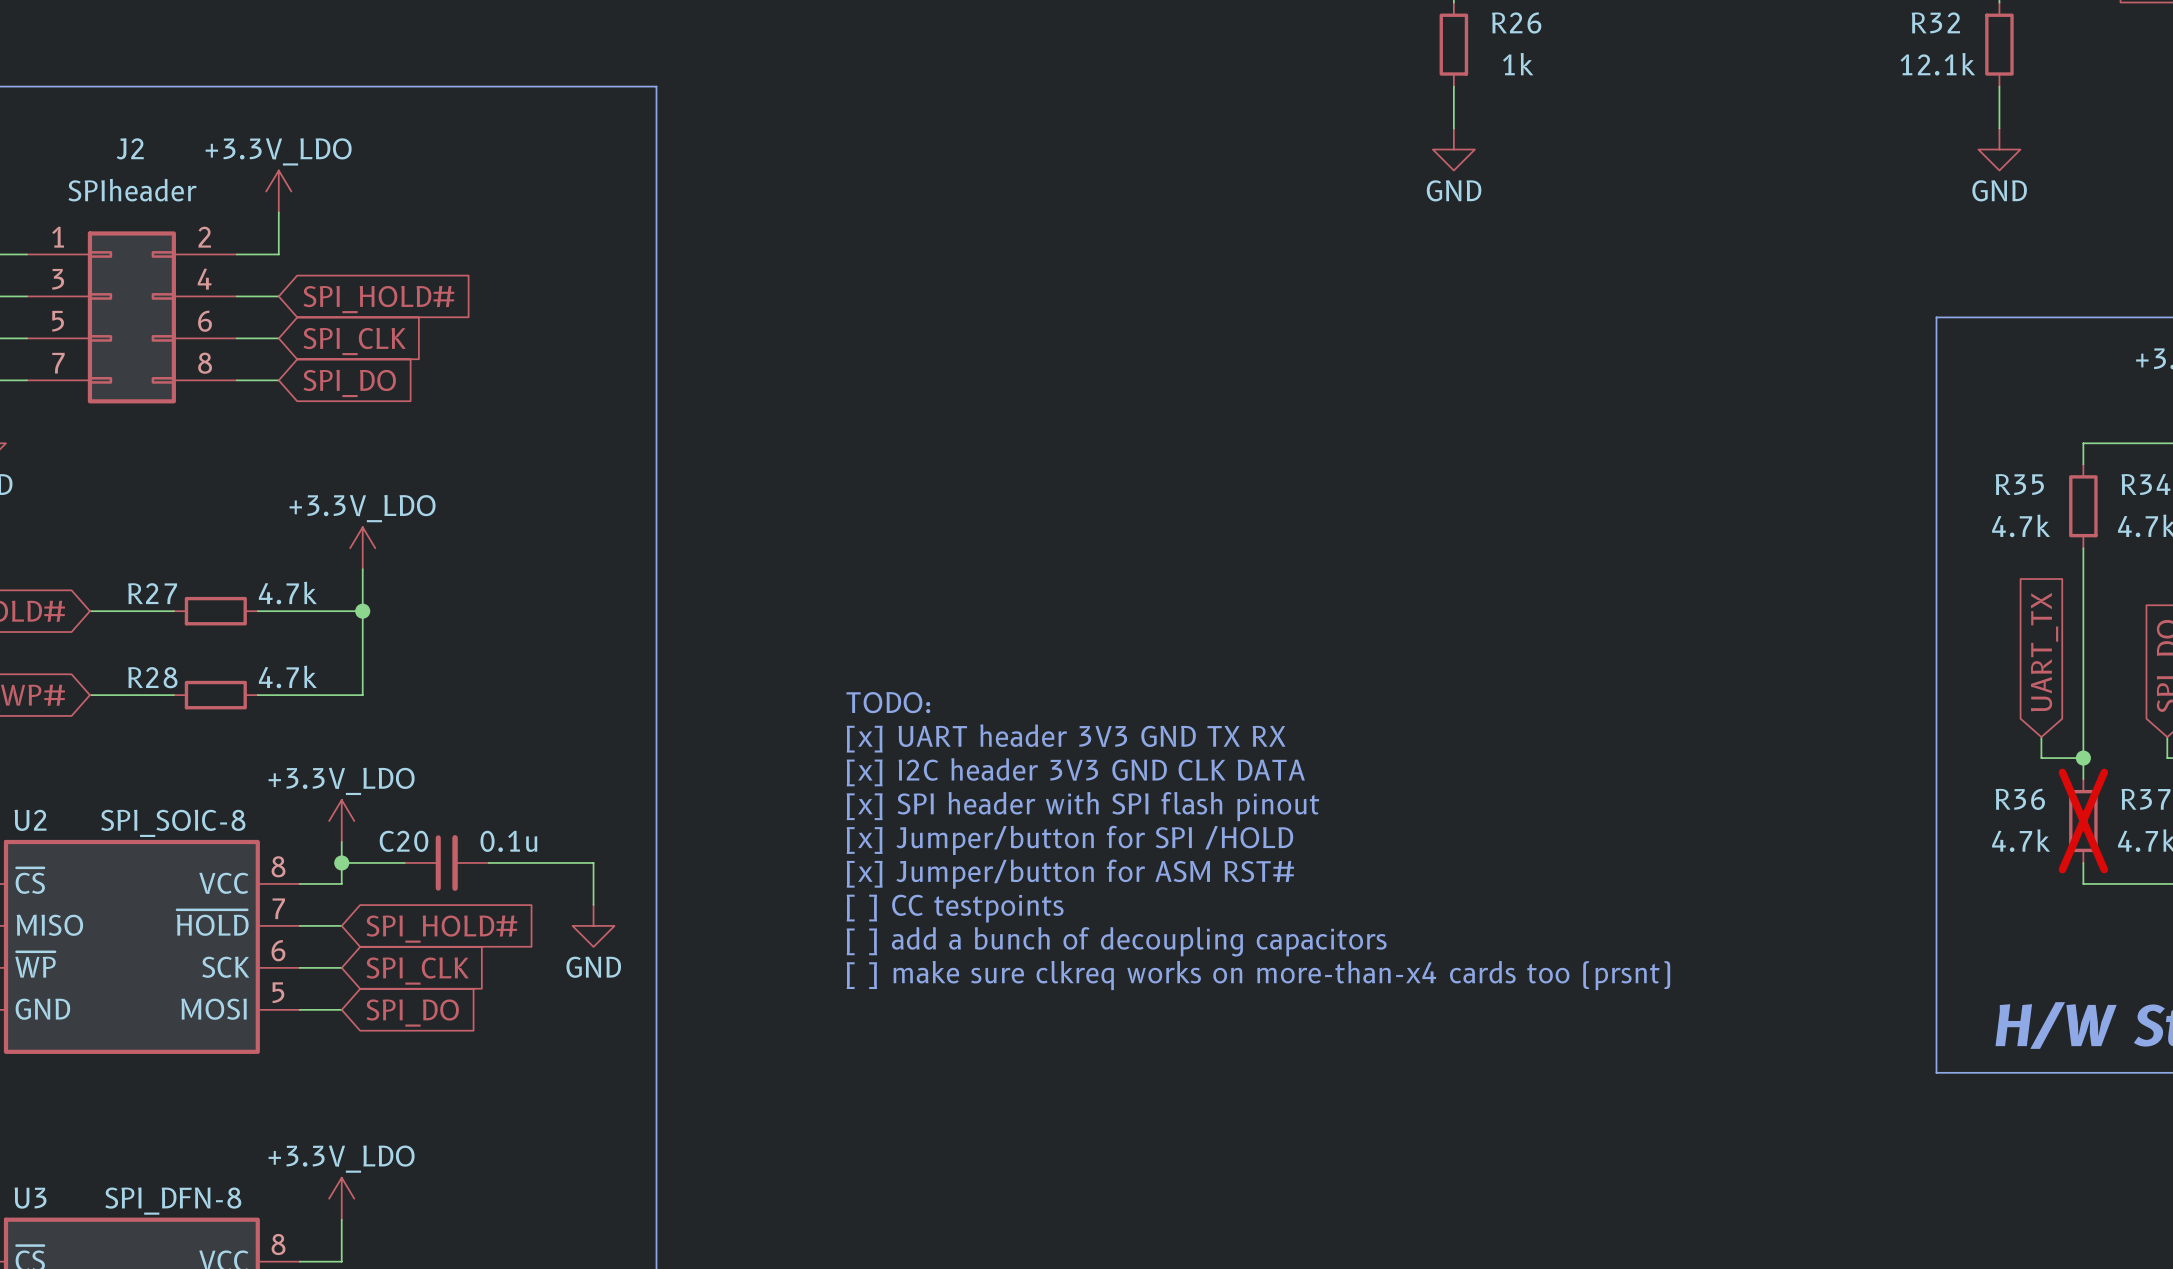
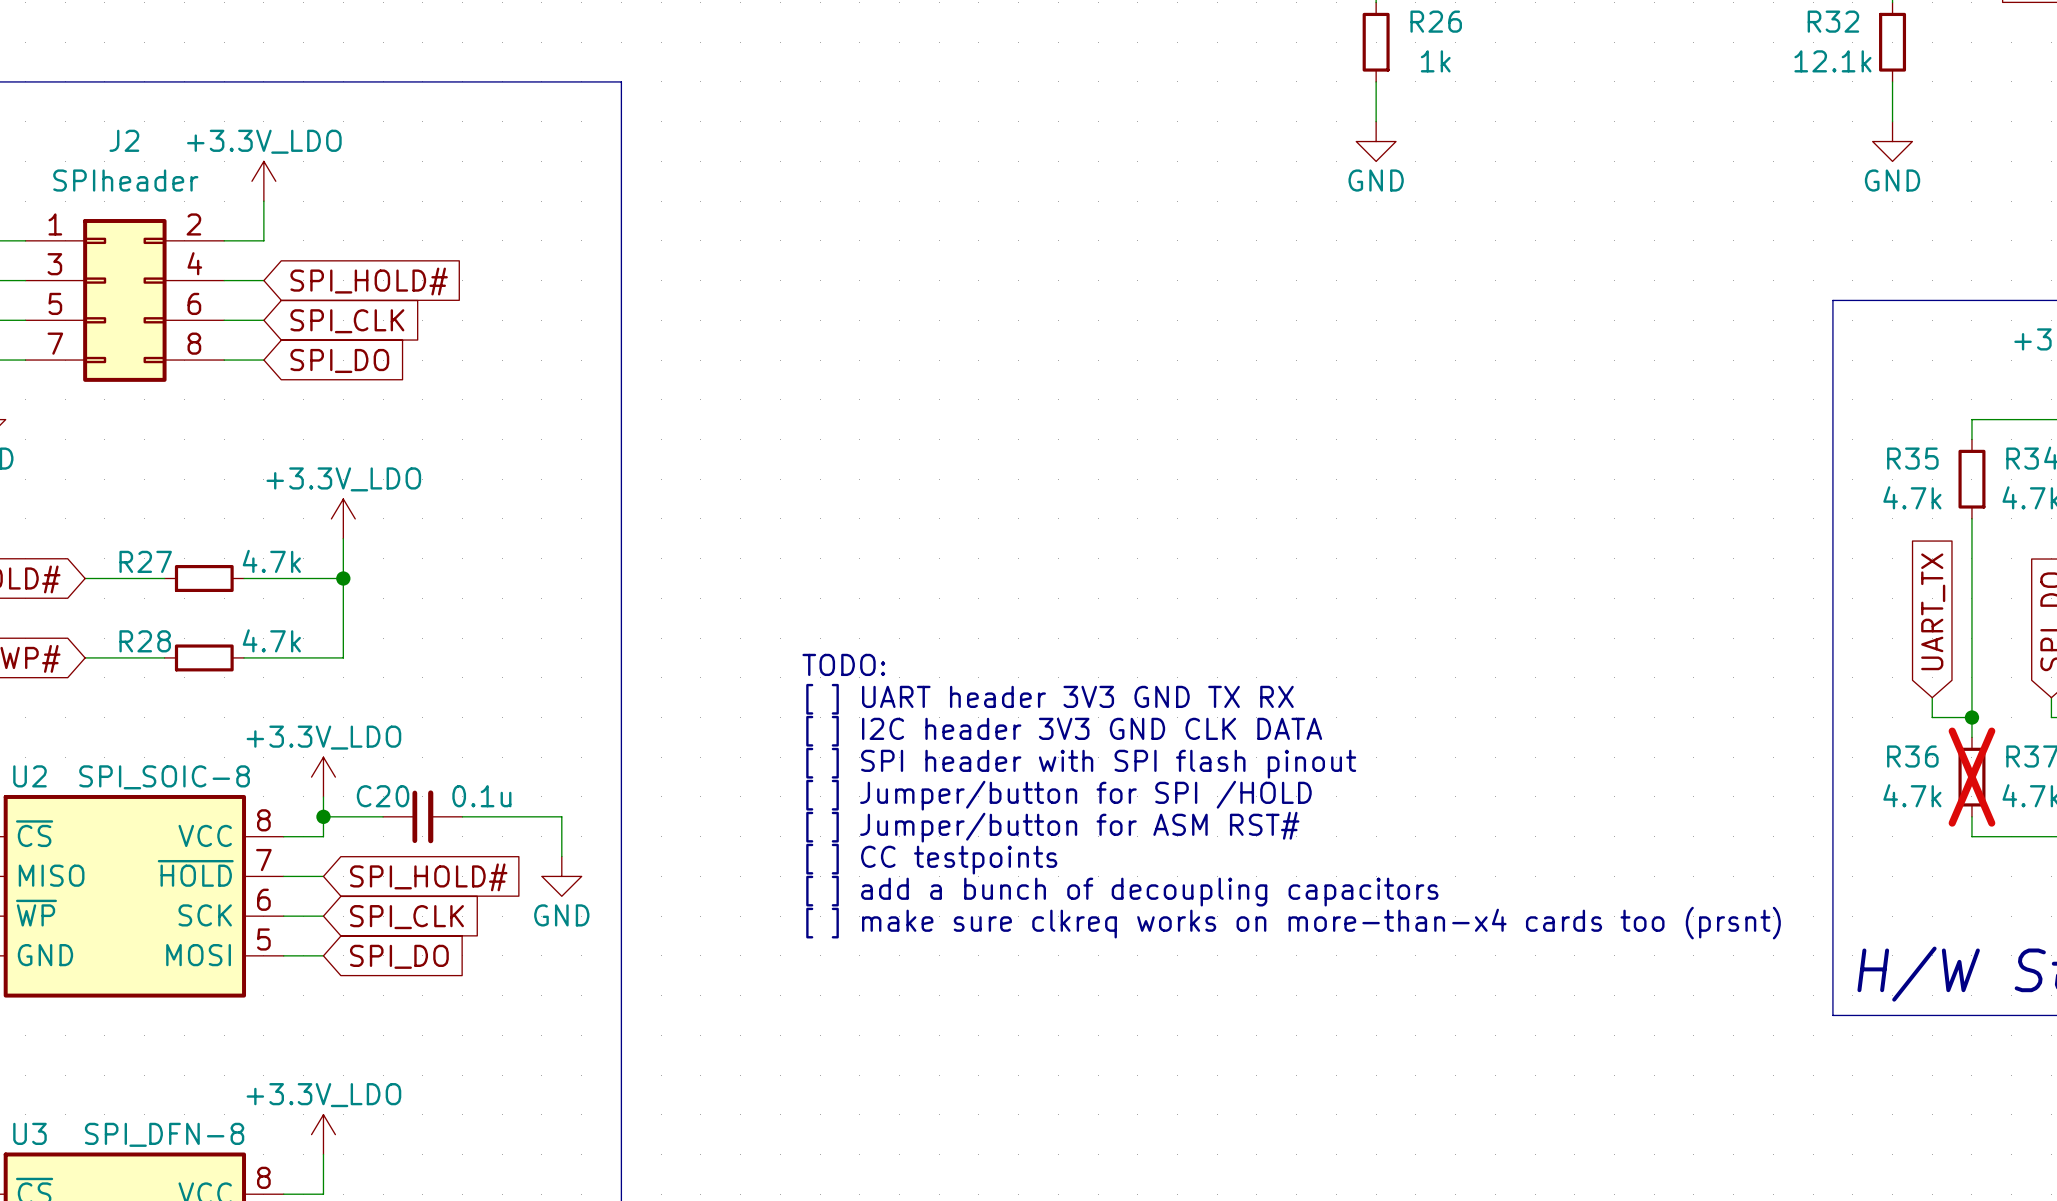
text: [x] UART header 3V3 GND TX RX (1066, 738) -> [ ] UART header 3V3 GND TX RX (1049, 699)
text: [x] I2C header 3V3 GND CLK DATA (1075, 772) -> [ ] I2C header 3V3 GND CLK DATA (1064, 731)
text: [x] SPI header with SPI flash pinout (1082, 806) -> [ ] SPI header with SPI flash pinout (1081, 763)
text: [x] Jumper/button for SPI /HOLD (1069, 840) -> [ ] Jumper/button for SPI /HOLD (1058, 795)
text: [x] Jumper/button for ASM RST# (1070, 874) -> [ ] Jumper/button for ASM RST# (1052, 827)

